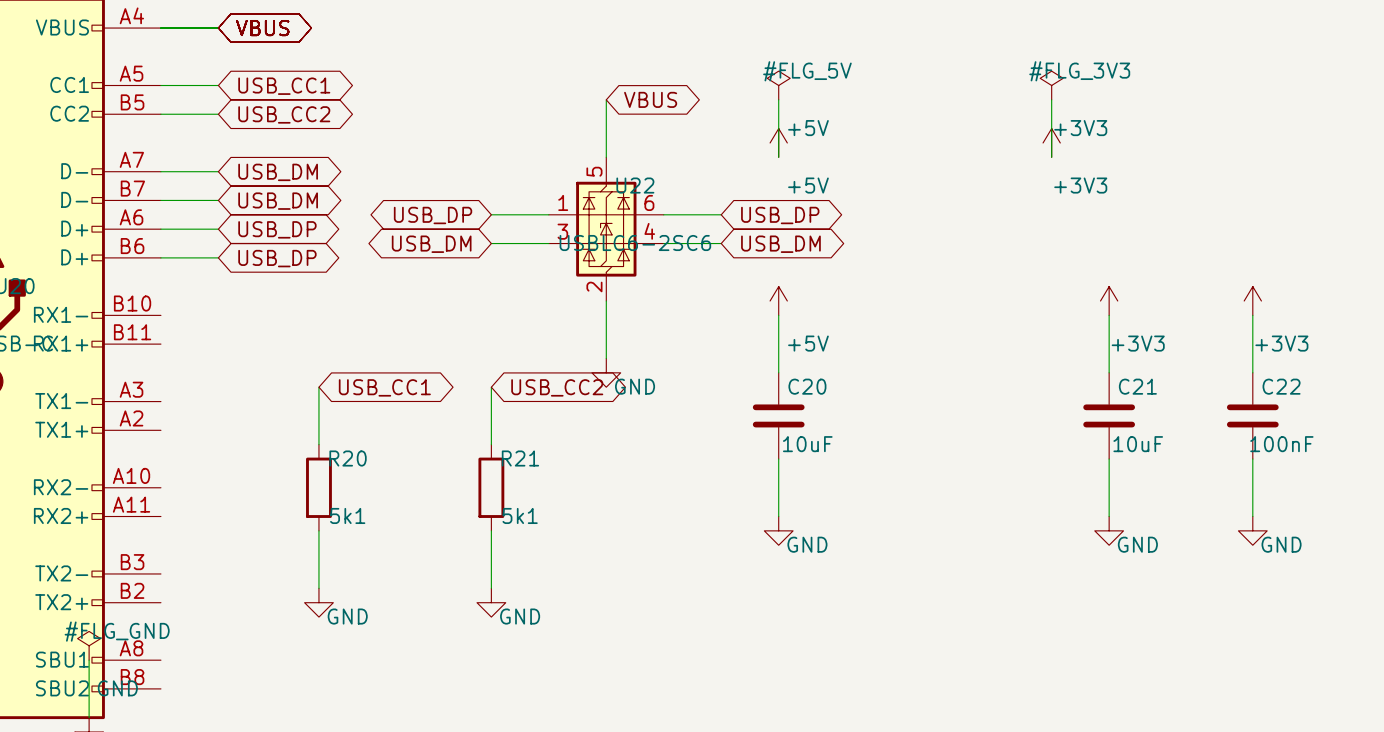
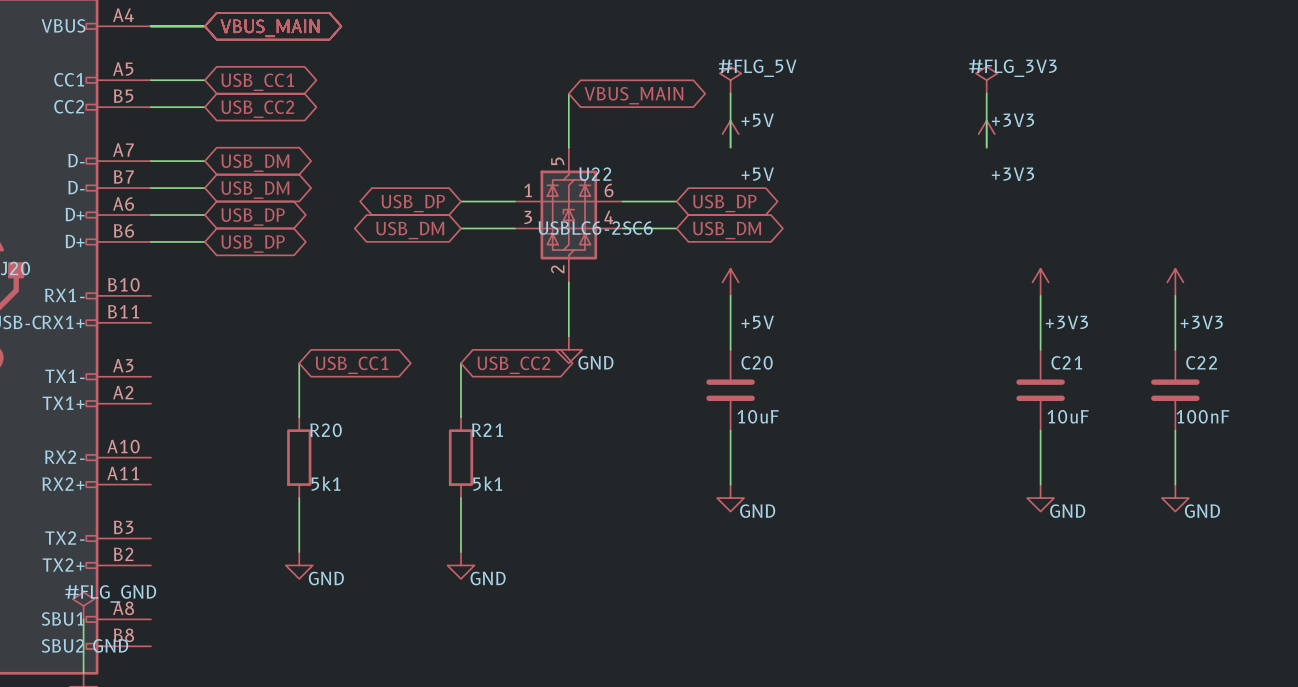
global label: VBUS (262, 28) -> VBUS_MAIN (270, 28)
global label: VBUS (650, 99) -> VBUS_MAIN (633, 95)

